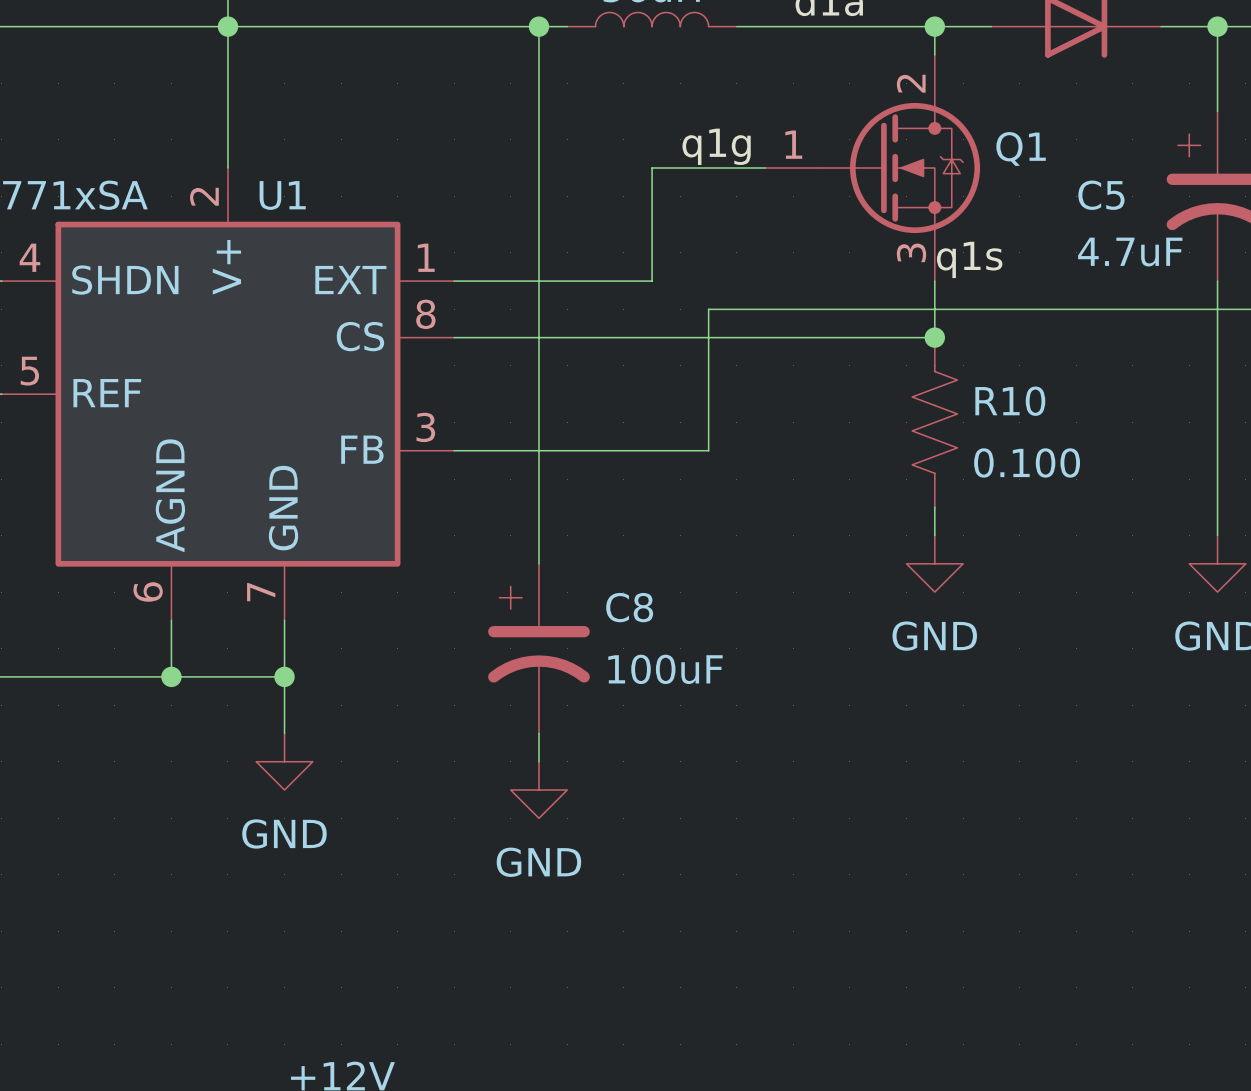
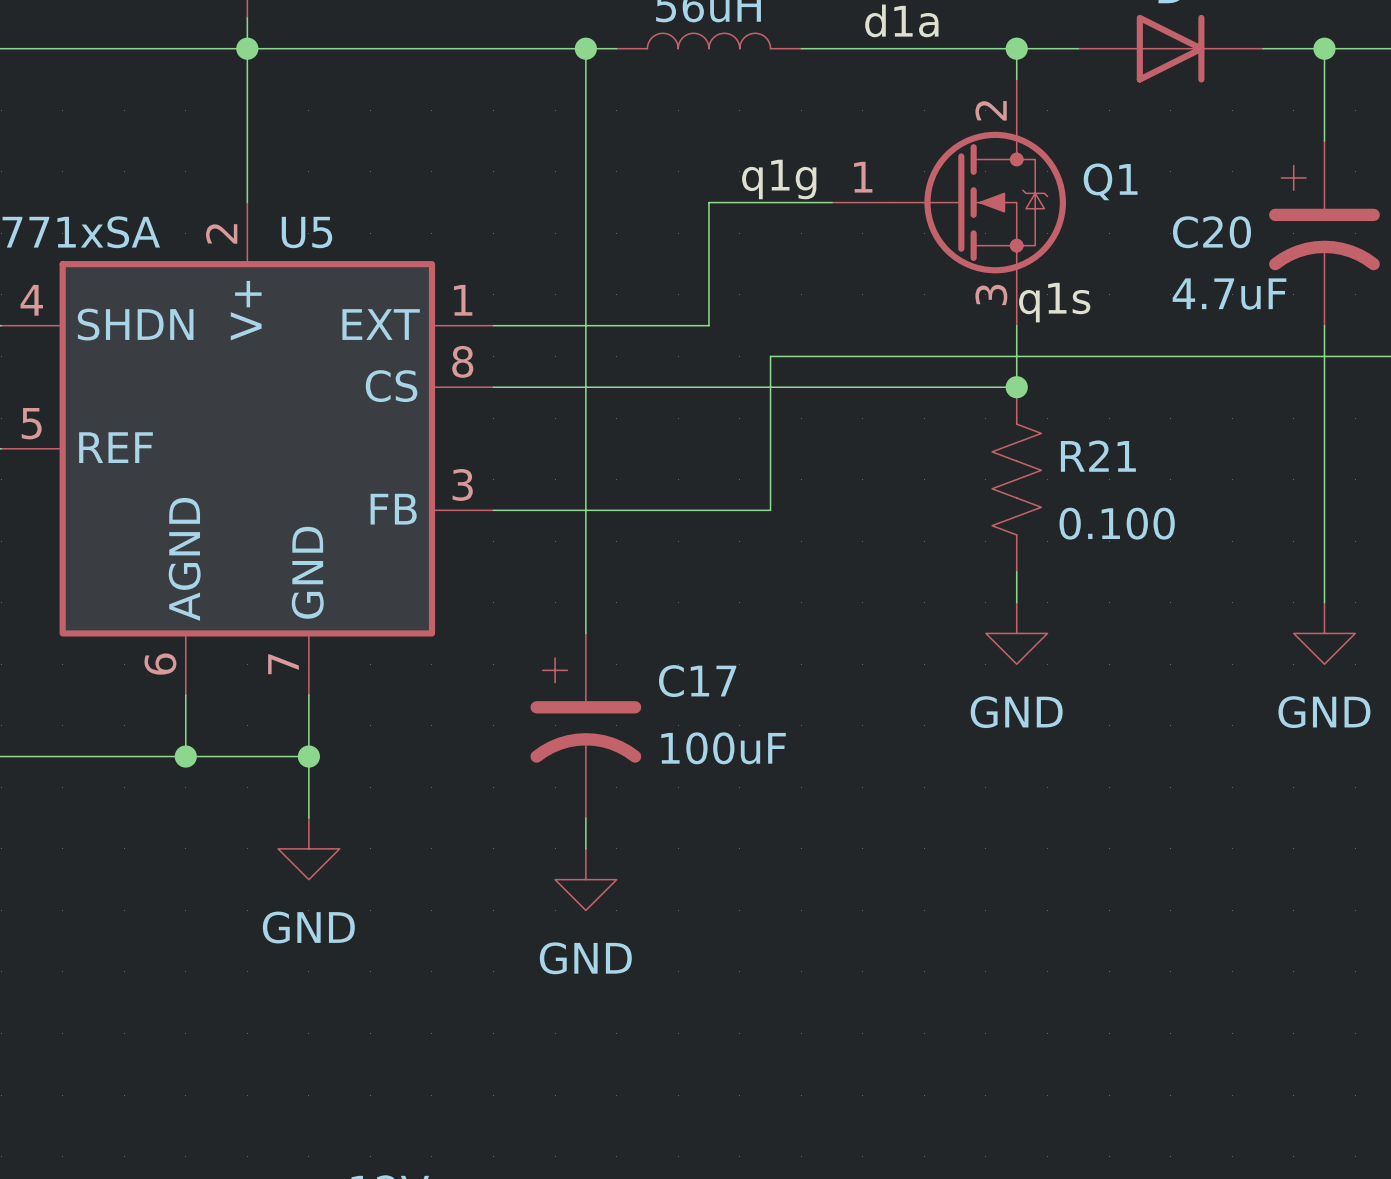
U1 name: U1 (282, 195) -> U5 (306, 232)
C5 name: C5 (1101, 195) -> C20 (1211, 232)
R10 name: R10 (1010, 401) -> R21 (1098, 456)
C8 name: C8 (629, 607) -> C17 (697, 681)

